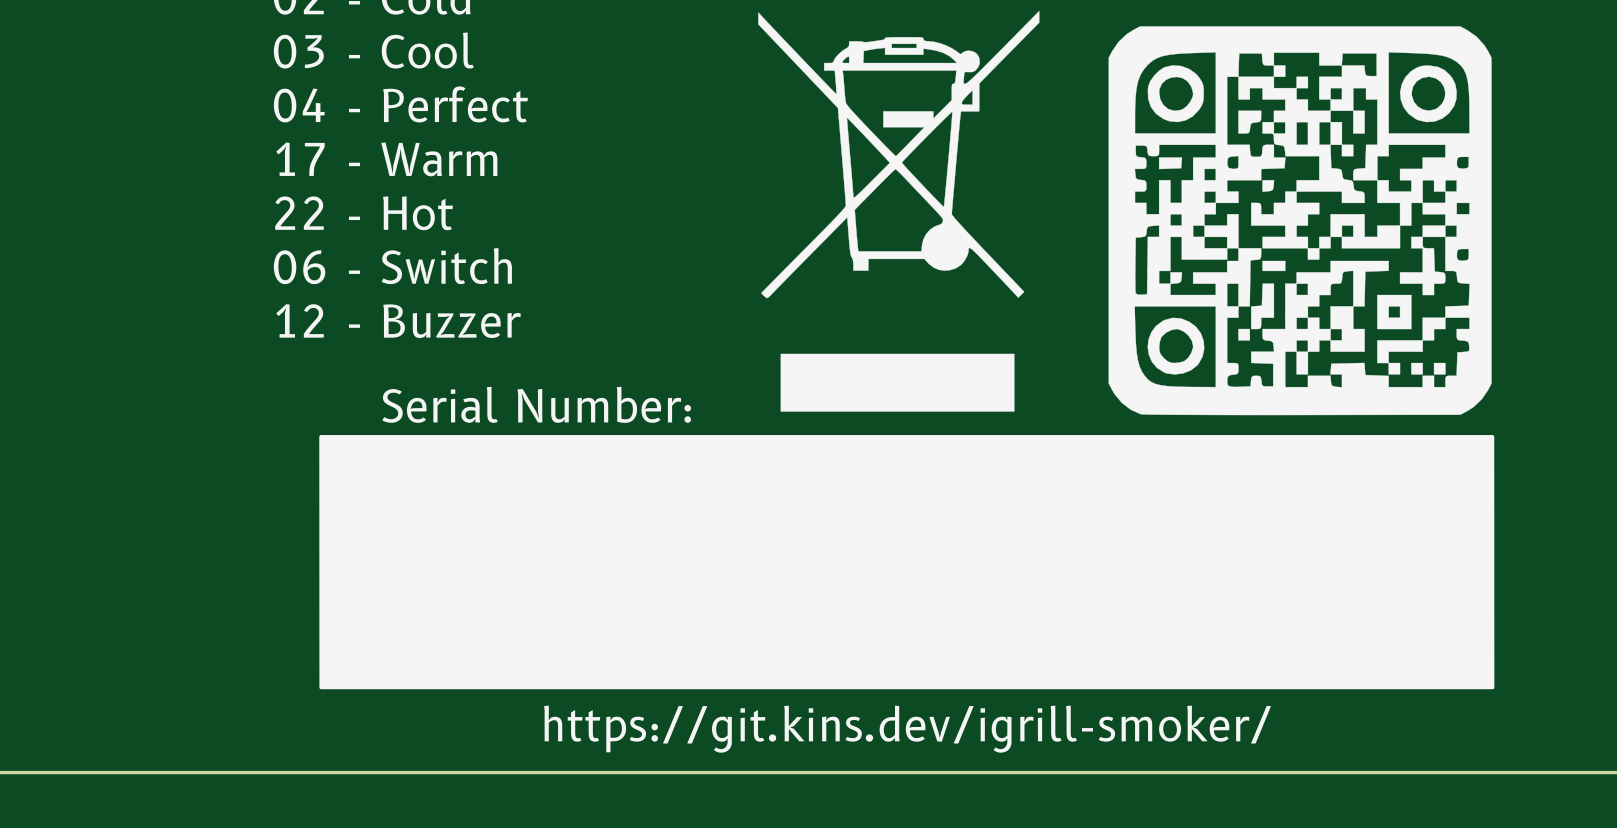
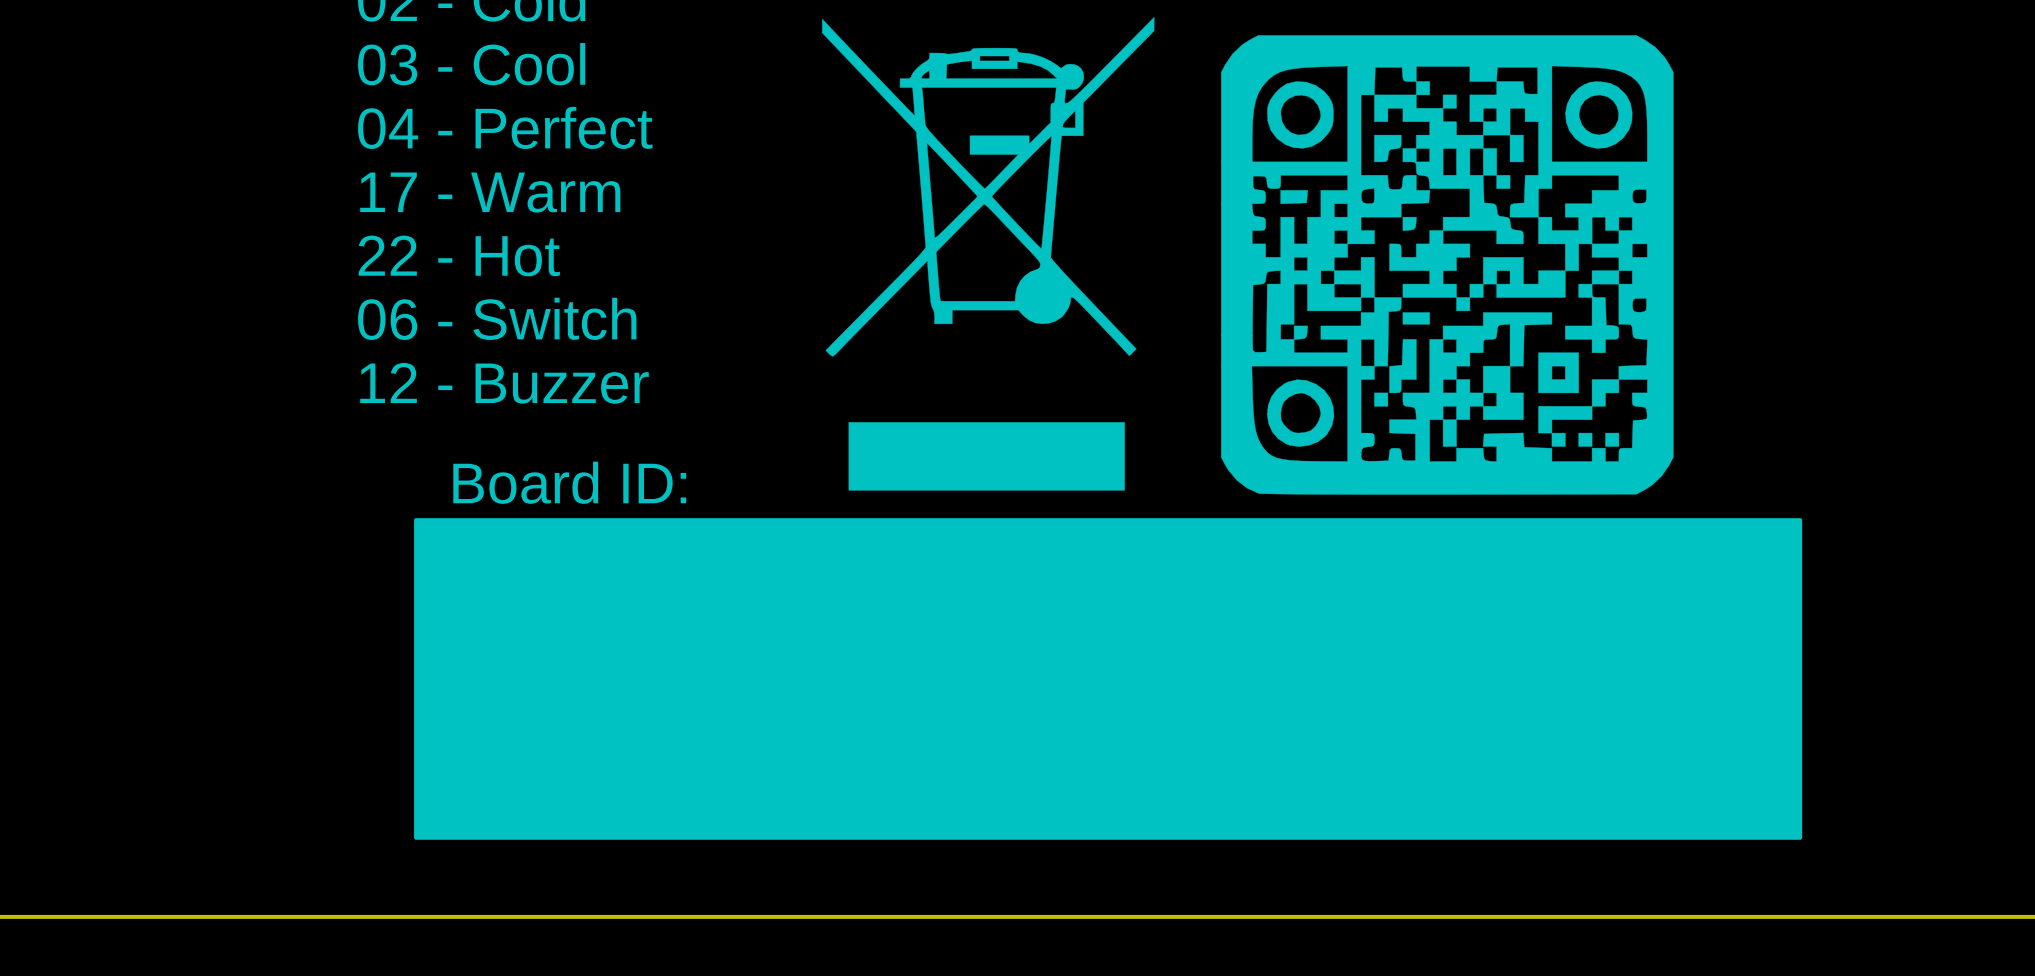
drawing position: (898, 211) -> (988, 253)
drawing position: (1300, 220) -> (1447, 264)
text: none -> Board ID: (569, 482)
text: Serial Number: (536, 404) -> none
drawing shape: [319, 435, 1495, 690] -> [414, 518, 1803, 840]
text: https://git.kins.dev/igrill-smoker/ (907, 729) -> none

